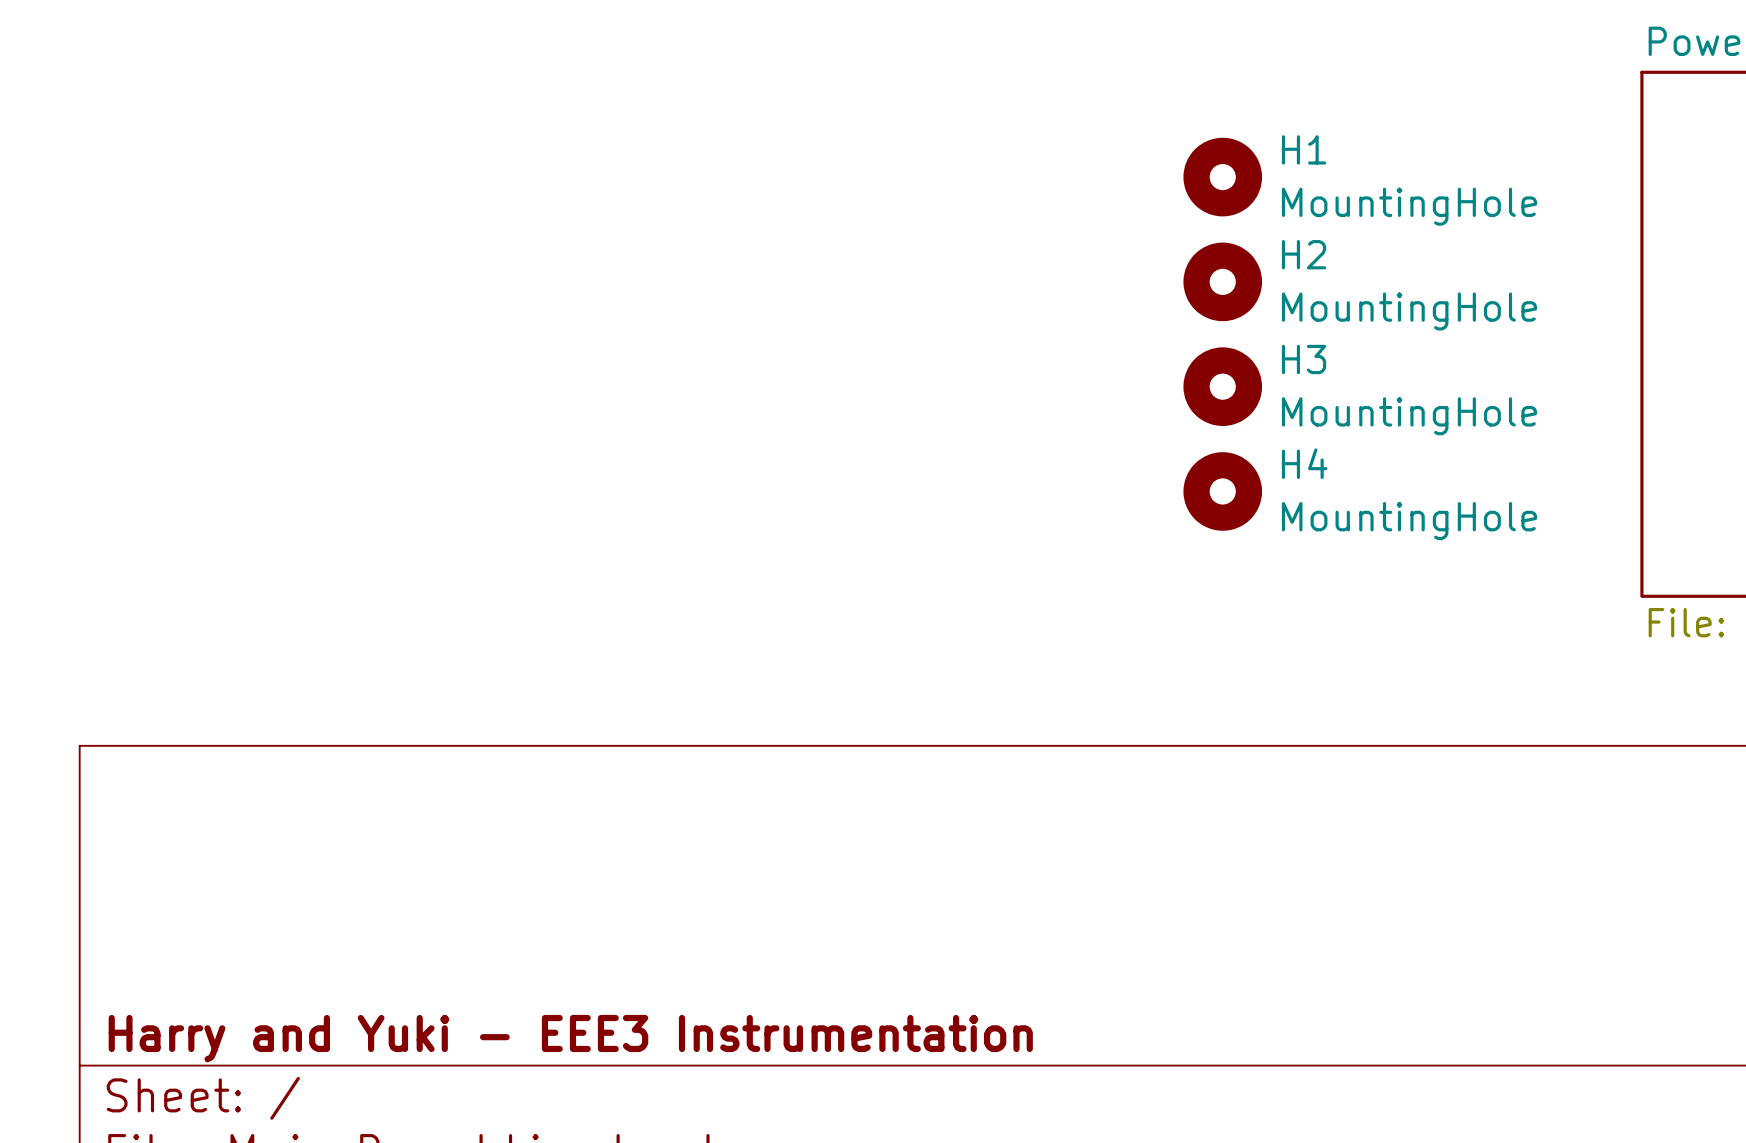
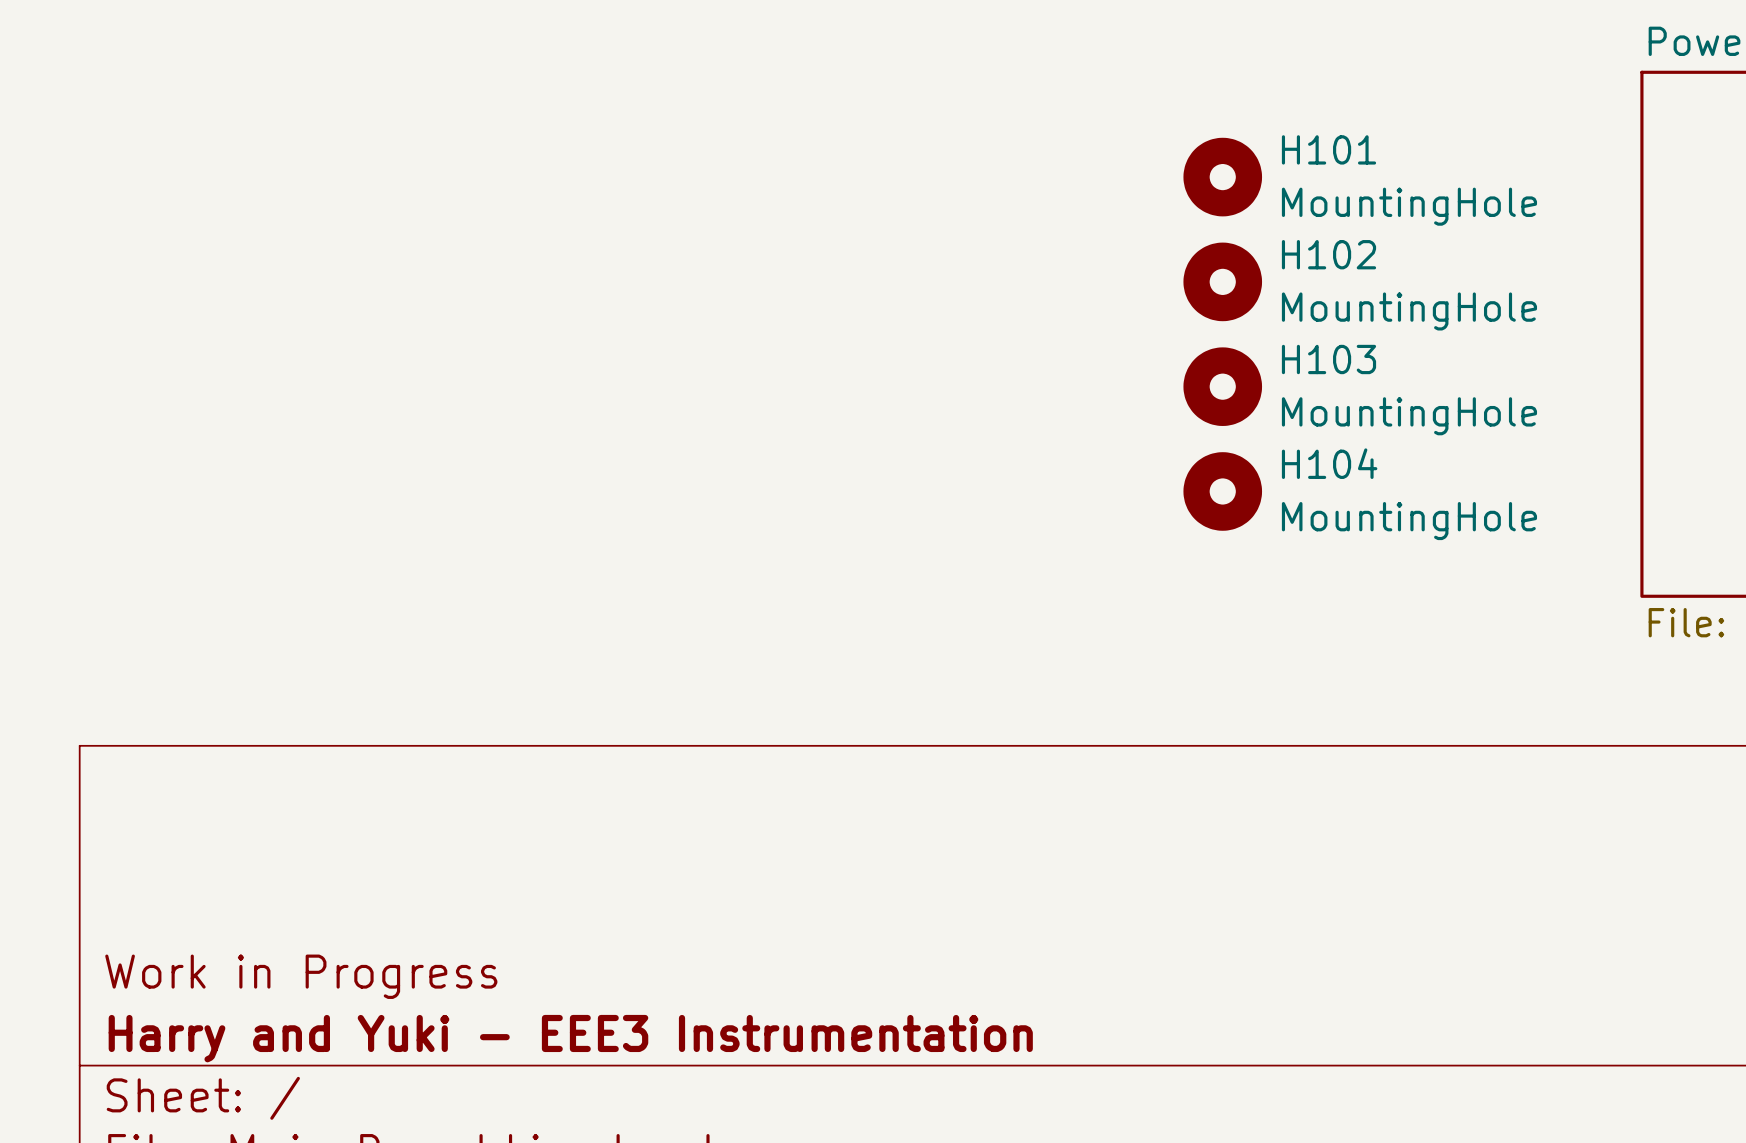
H1 name: H1 (1304, 149) -> H101 (1328, 149)
H2 name: H2 (1304, 254) -> H102 (1328, 254)
H3 name: H3 (1304, 359) -> H103 (1328, 359)
H4 name: H4 (1304, 463) -> H104 (1329, 463)
title block: none -> Work in Progress (301, 976)

